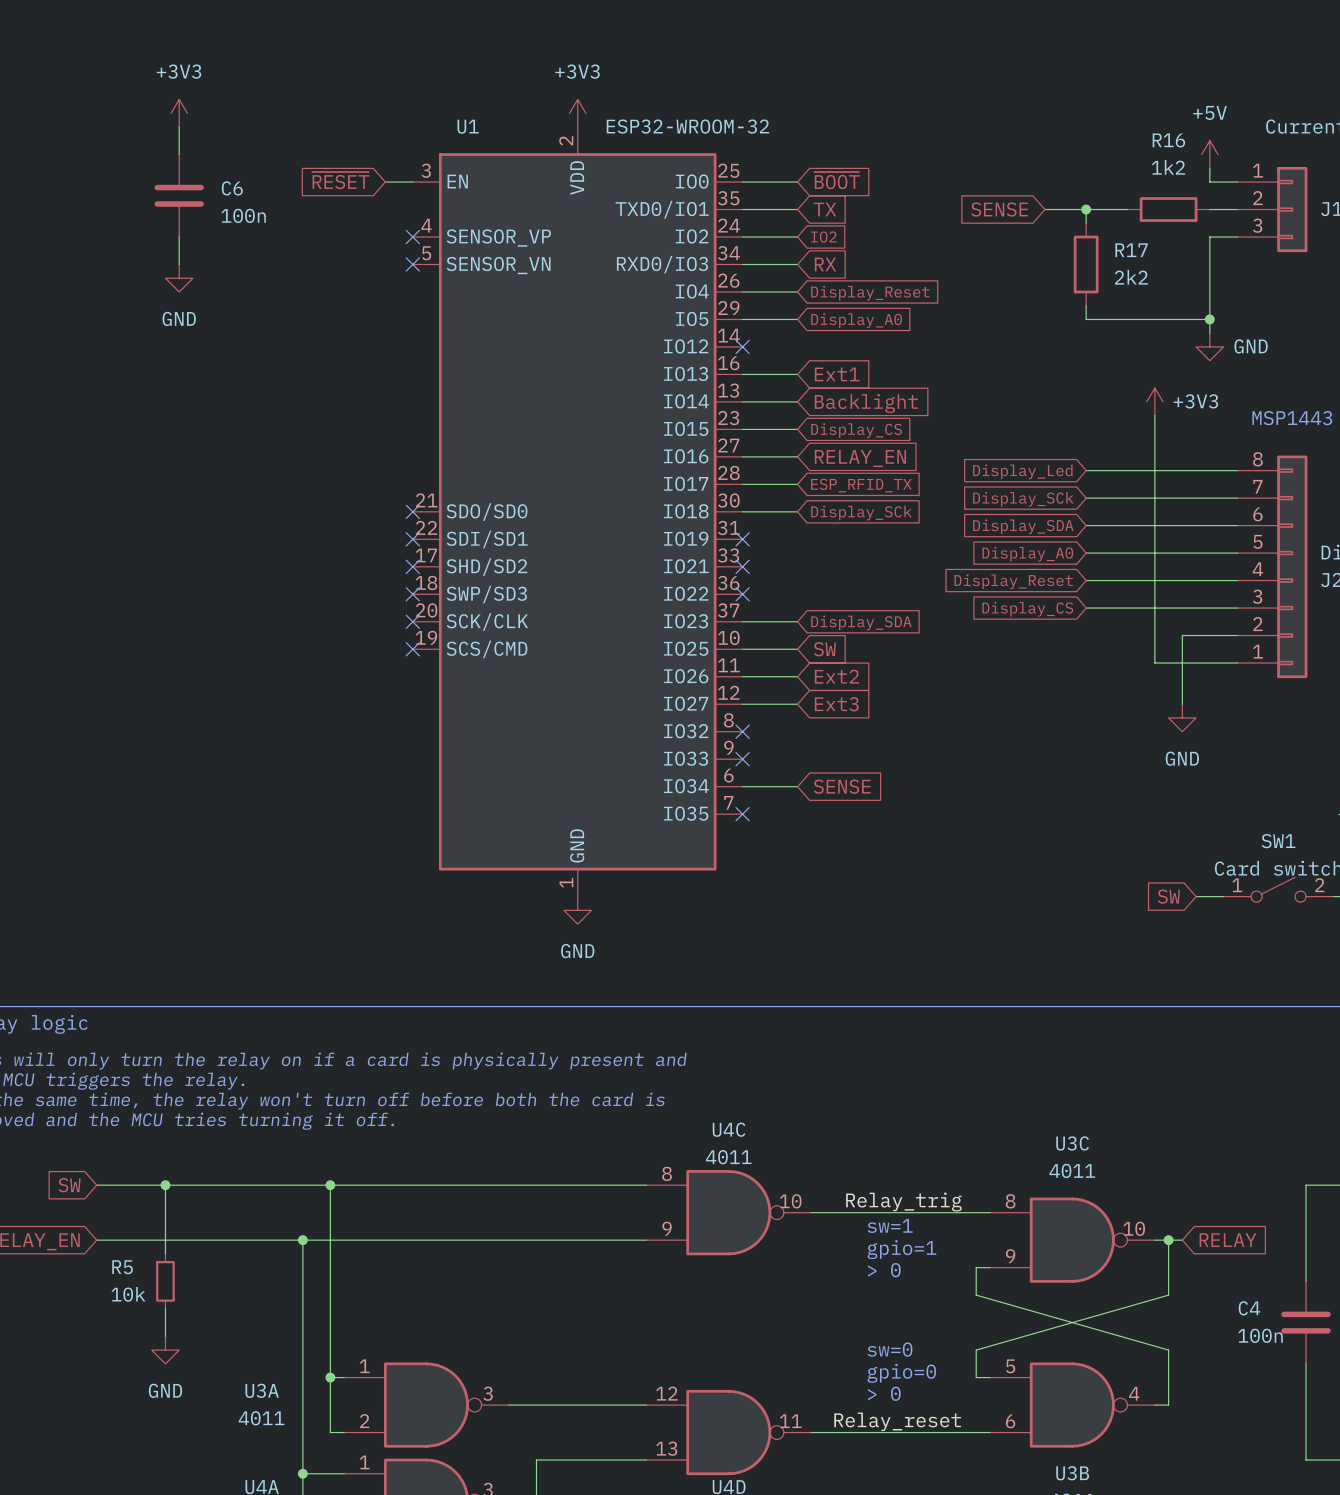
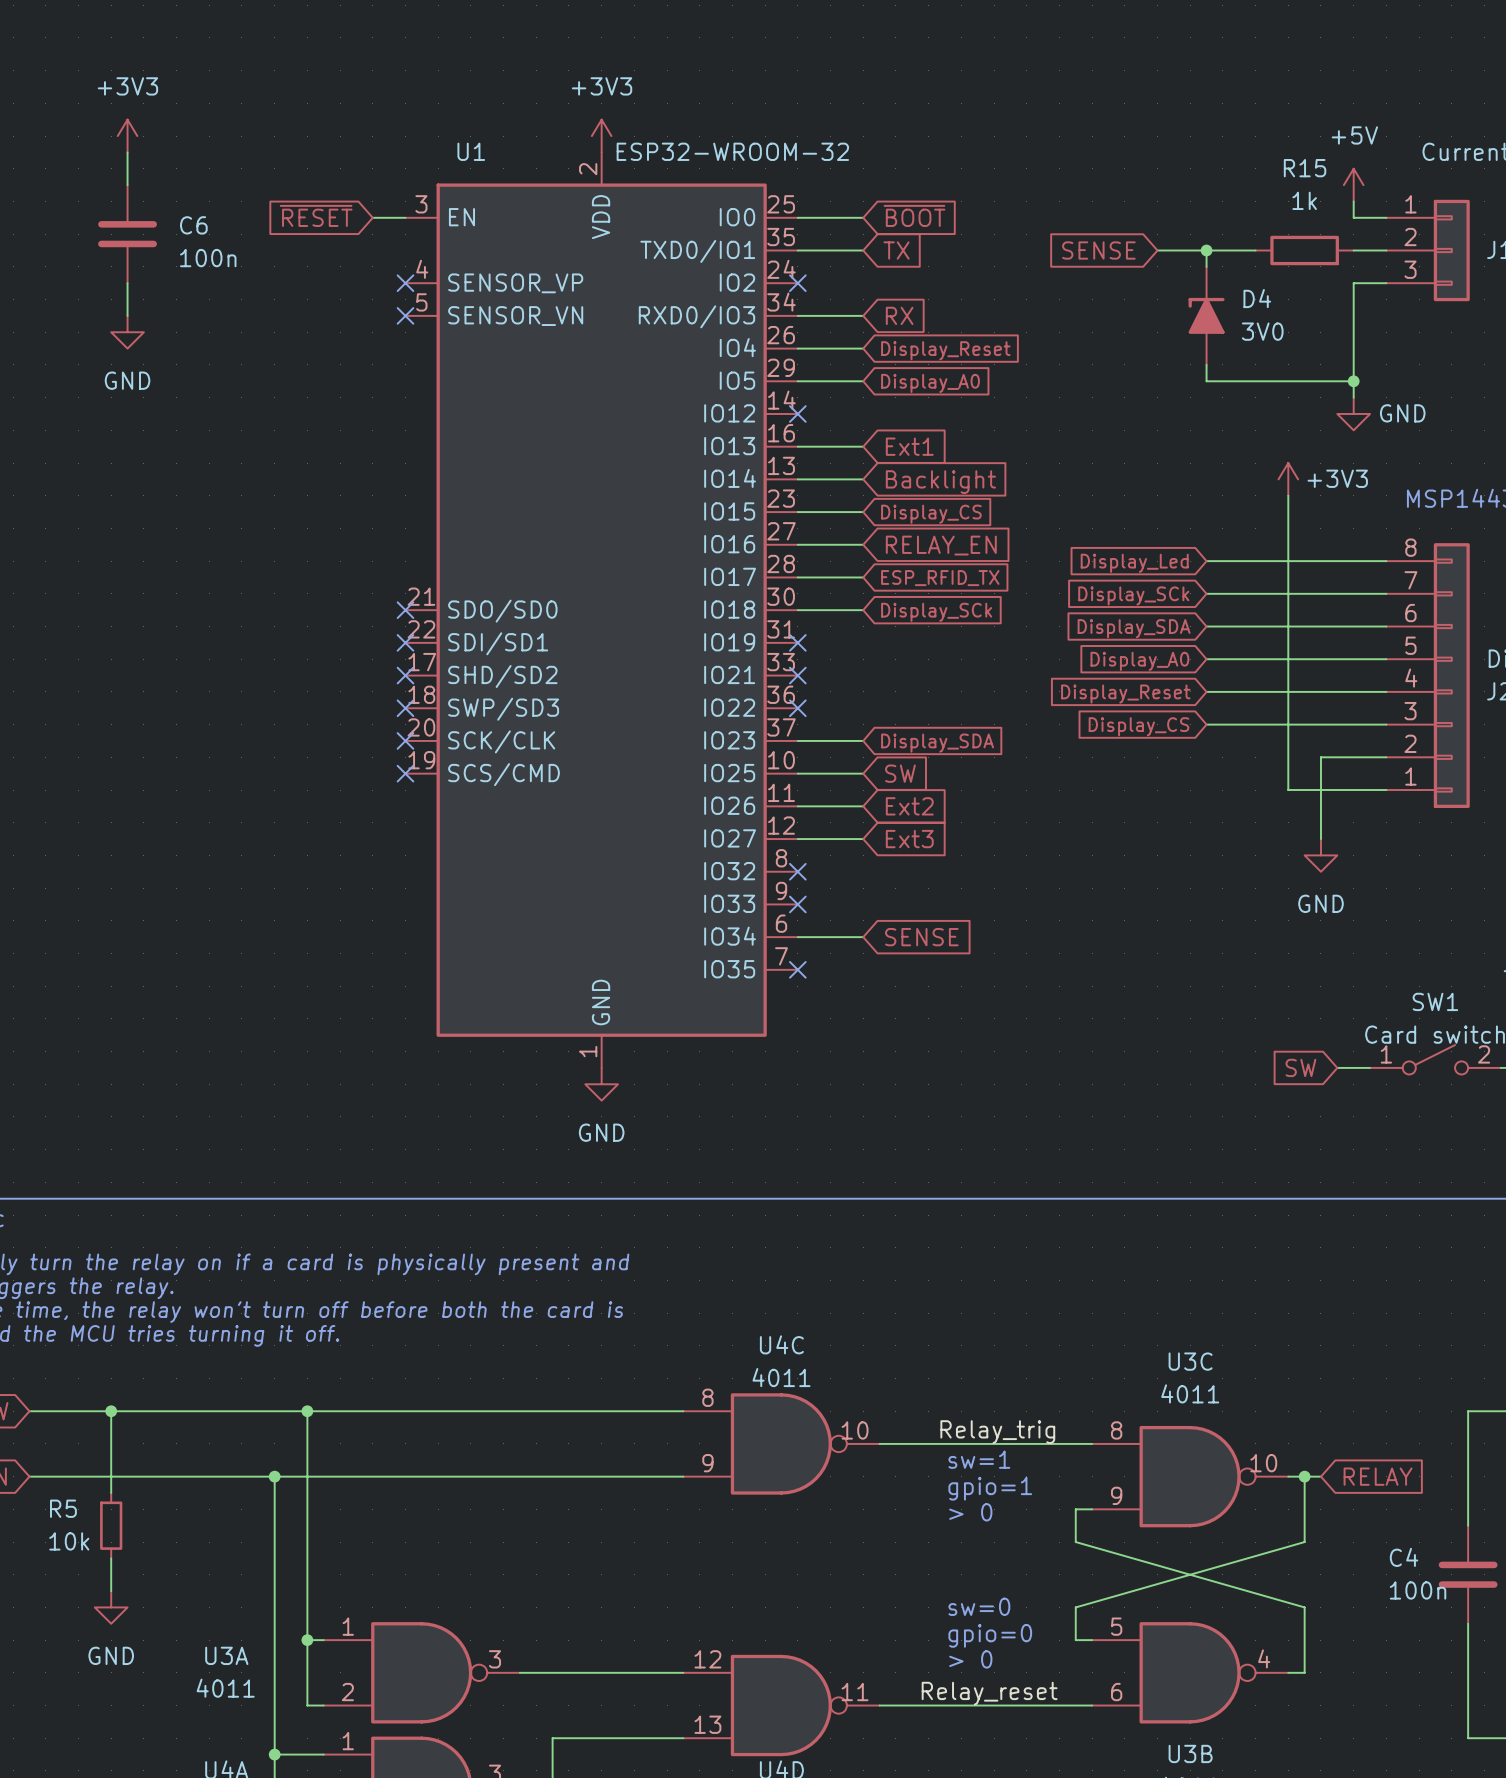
R16 name: R16 (1168, 140) -> R15 (1305, 168)
R16 value: 1k2 (1168, 167) -> 1k (1304, 200)
wire: (742, 237) (797, 237) -> none
no-connect mark: none -> (797, 283)
global label: IO2 (823, 237) -> none
R17: 2k2 (1086, 264) -> none
D4: none -> 3V0 (1206, 315)

